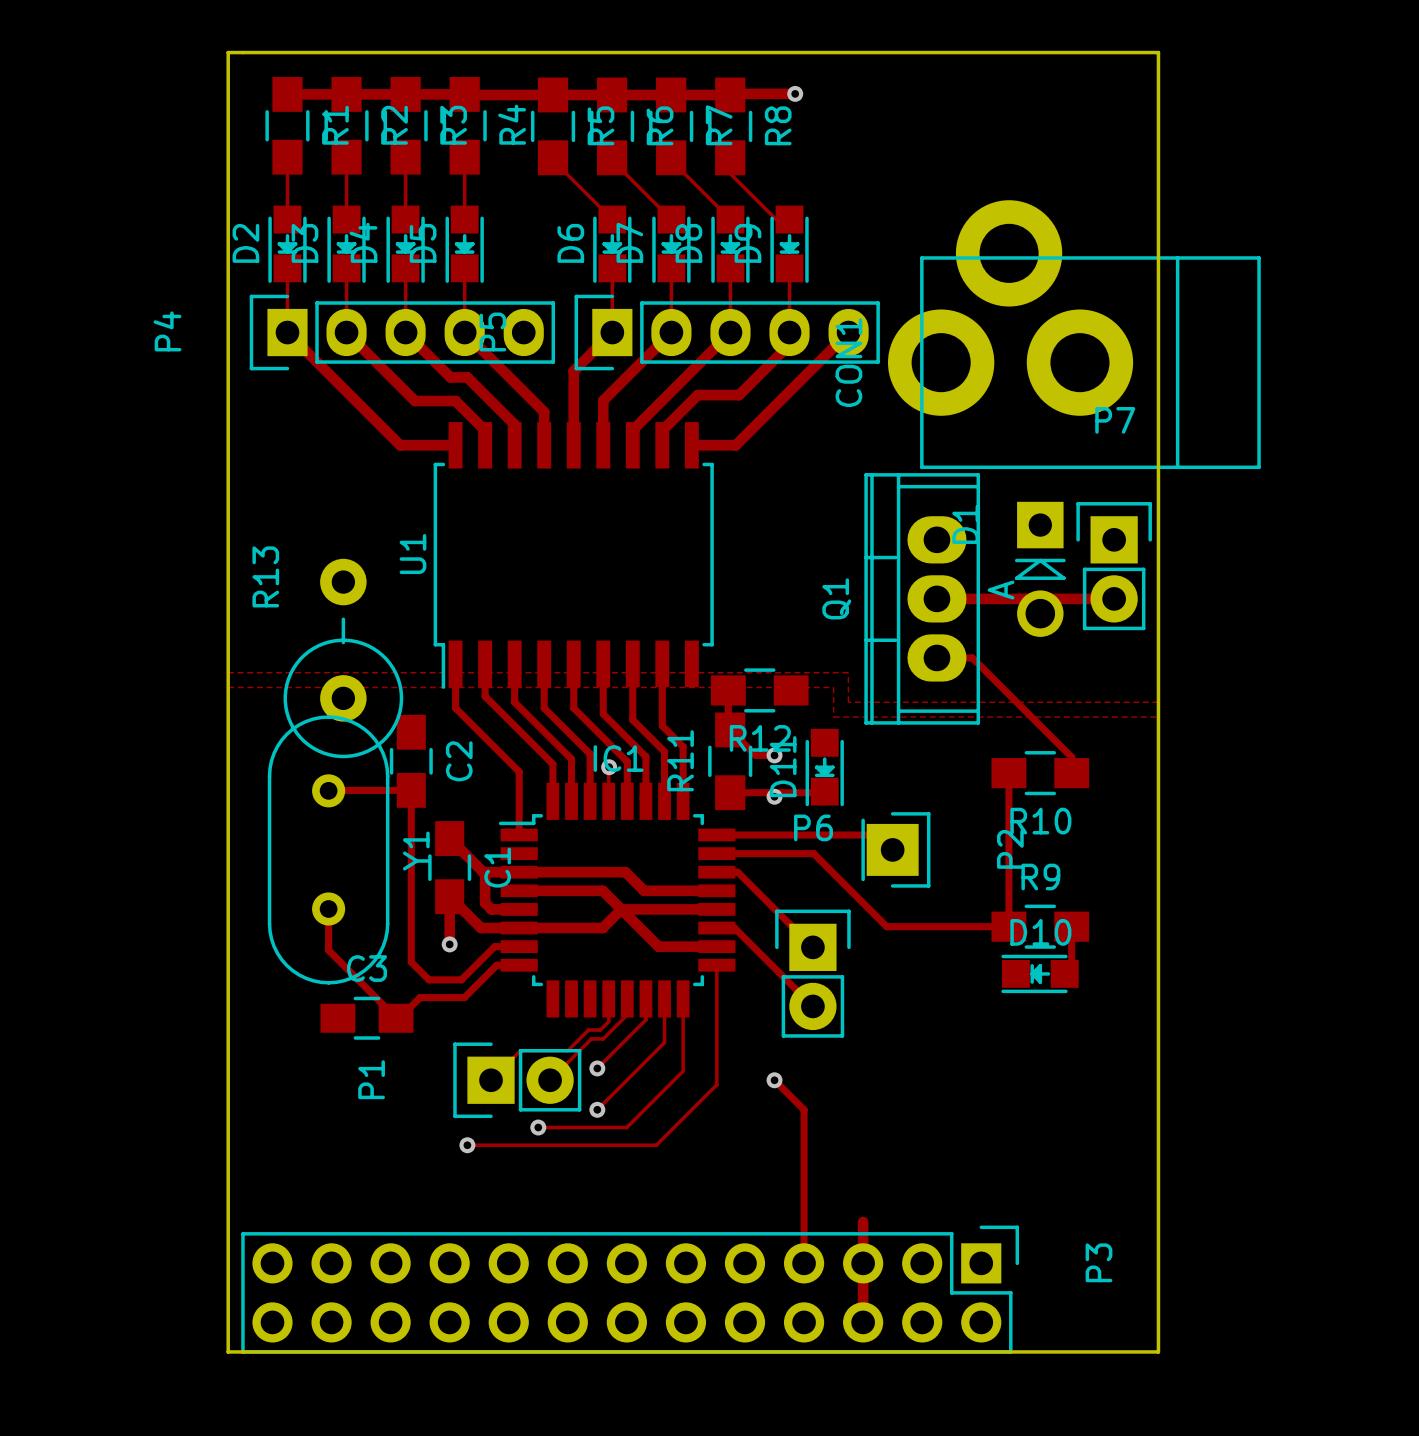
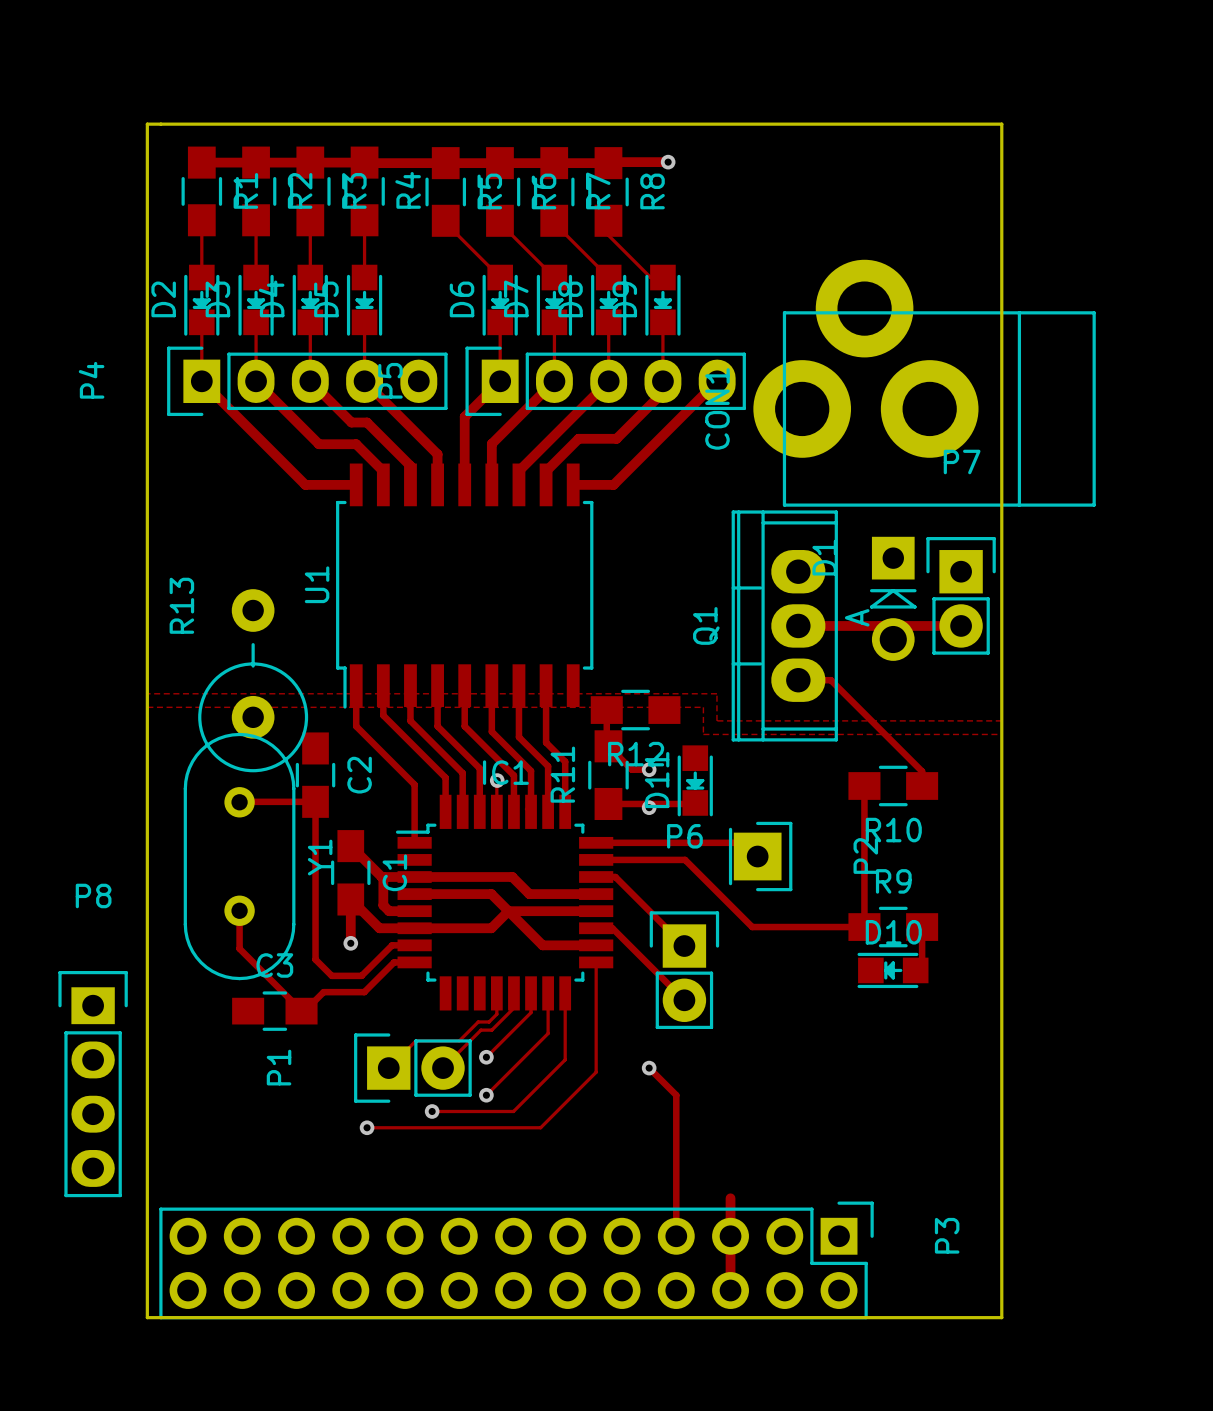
P8: none -> (93, 1084)

